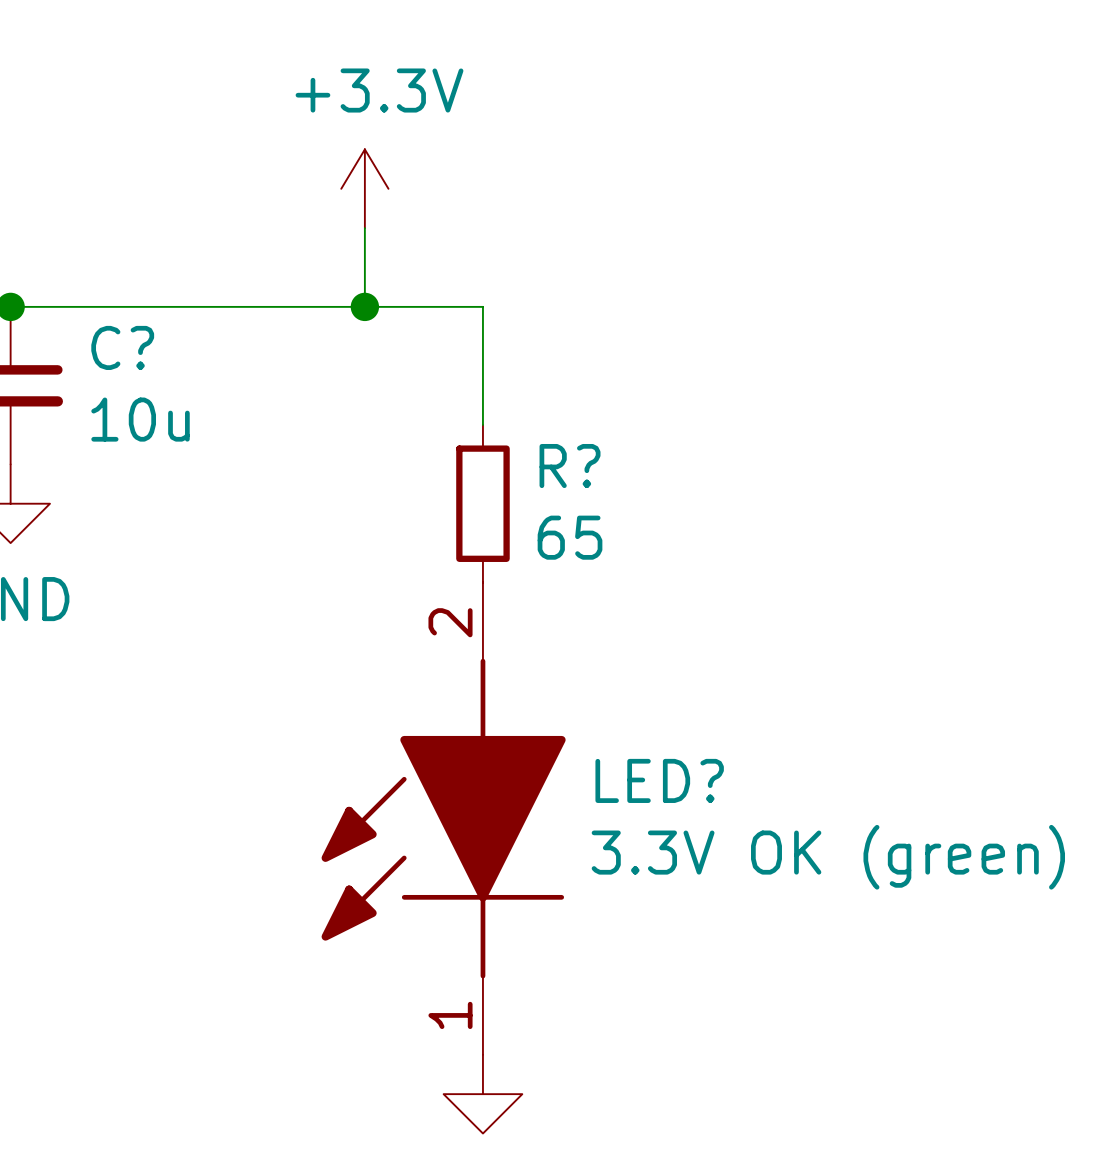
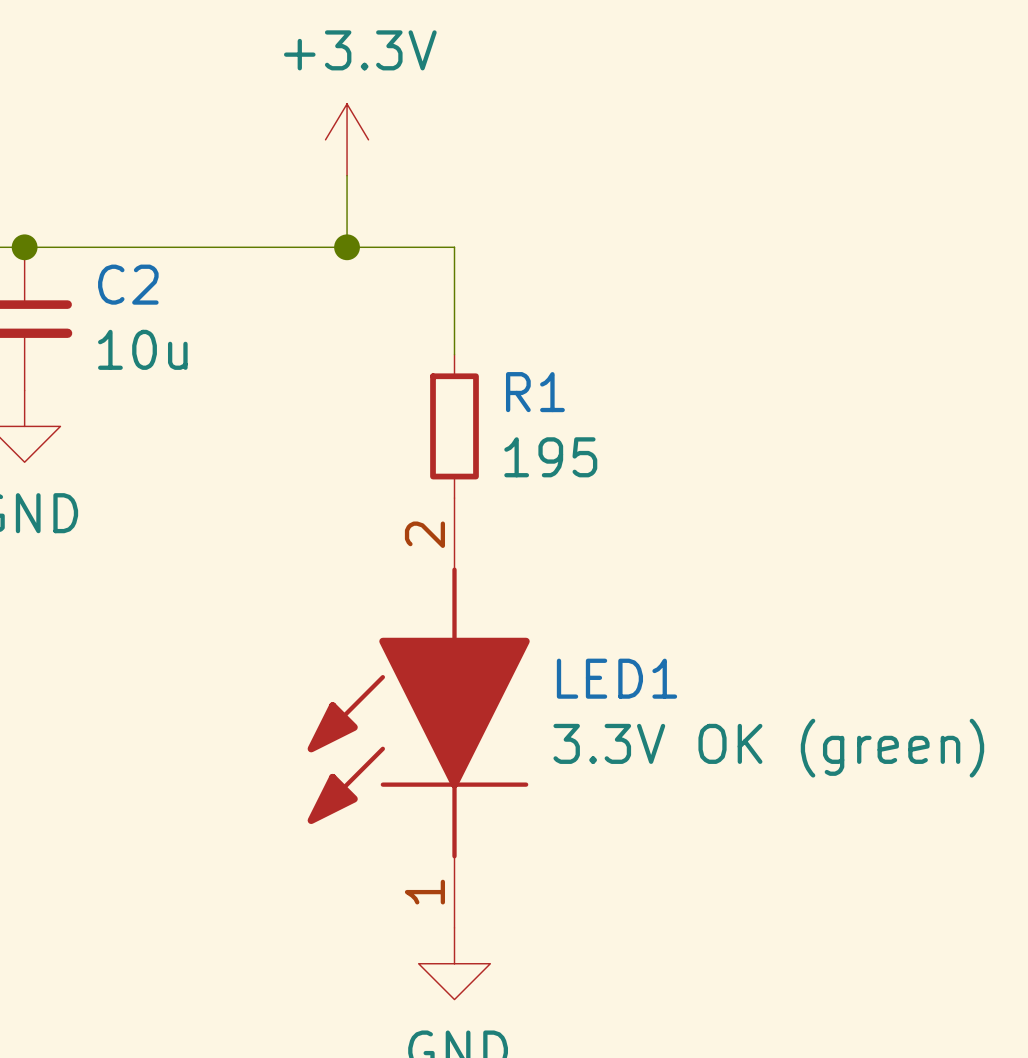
C? name: C? (122, 347) -> C2 (128, 284)
R? name: R? (570, 466) -> R1 (535, 392)
R? value: 65 (570, 537) -> 195 (550, 457)
LED? name: LED? (659, 780) -> LED1 (616, 678)

